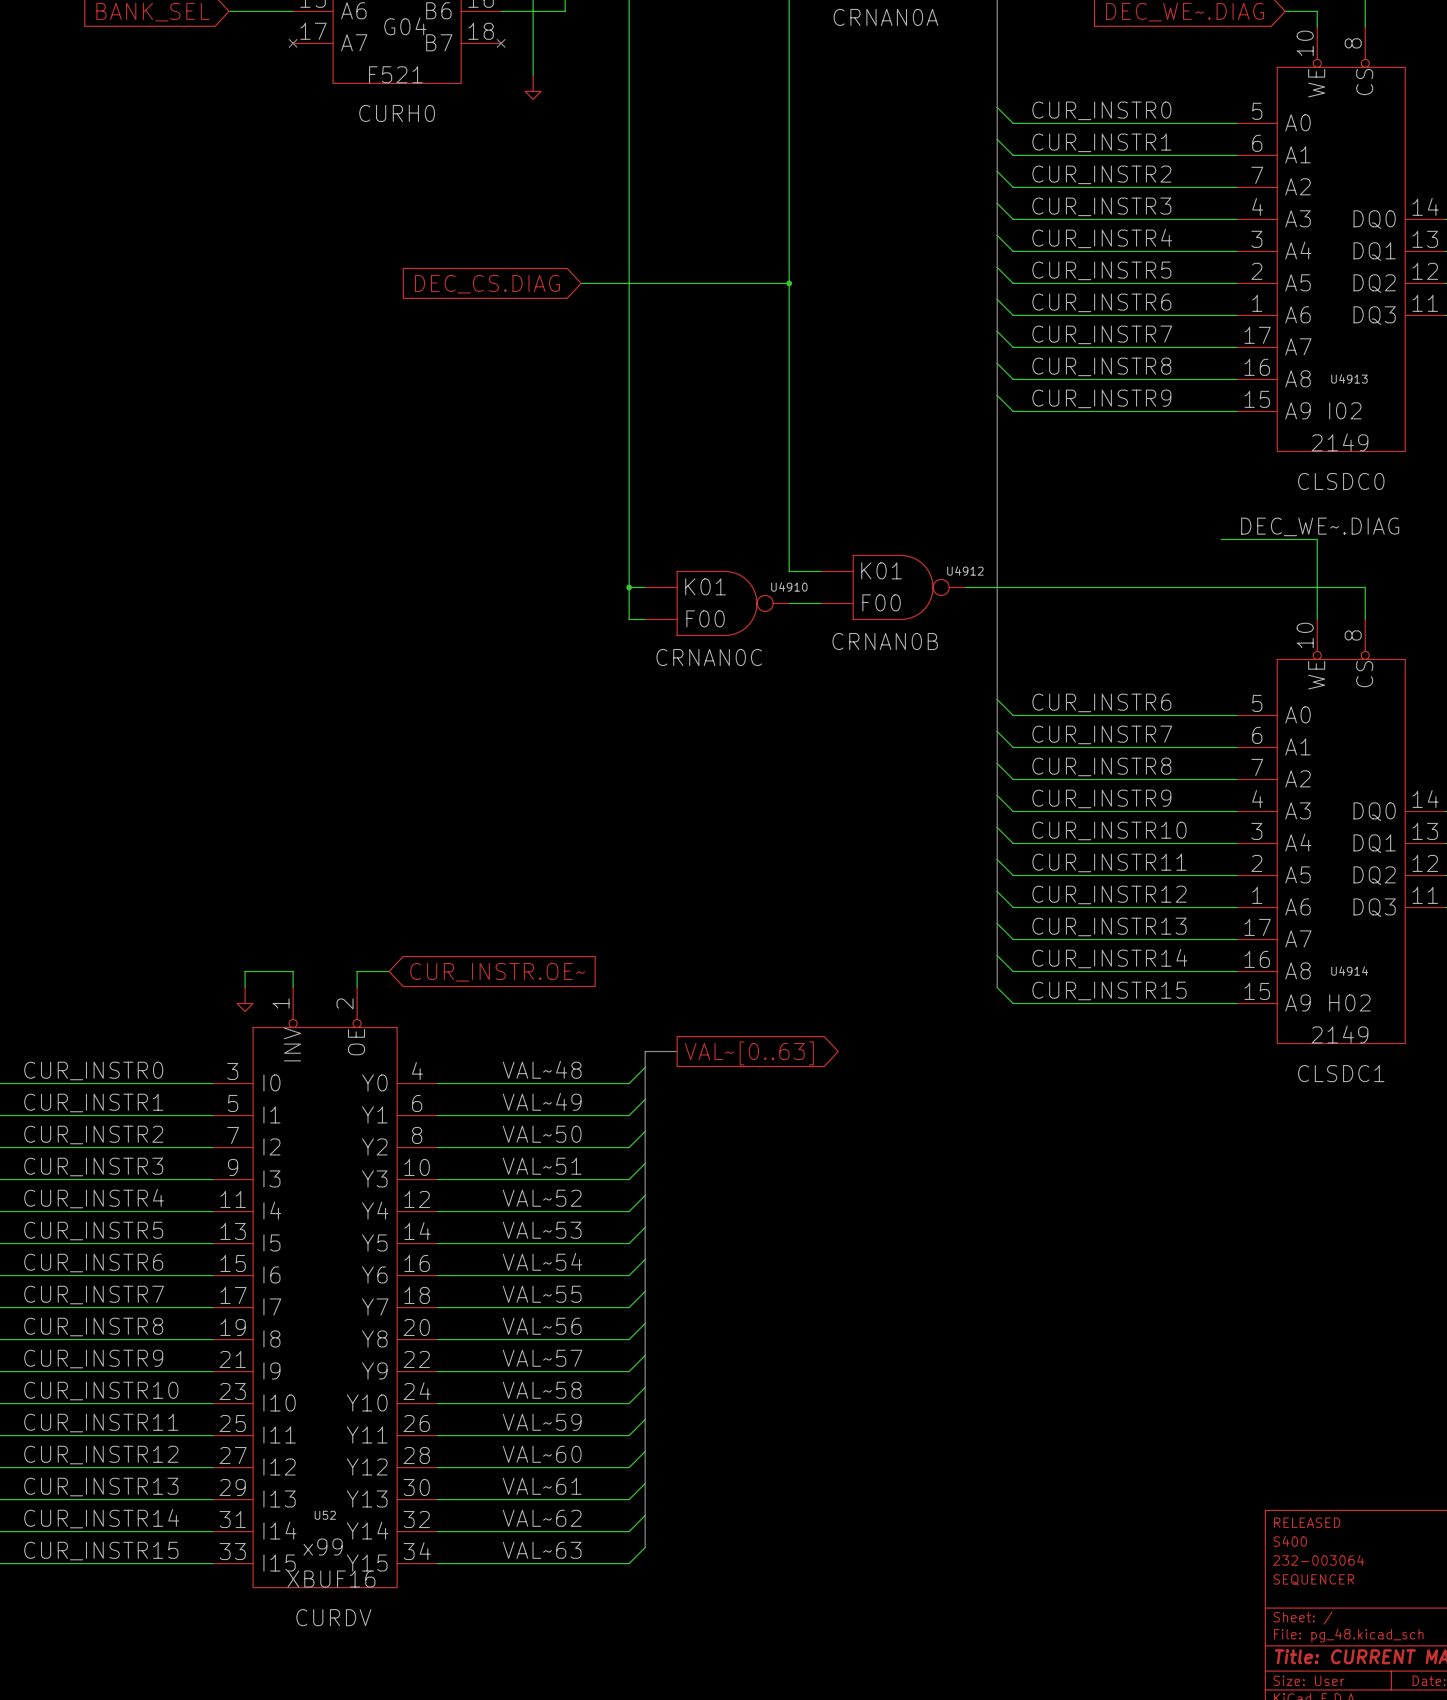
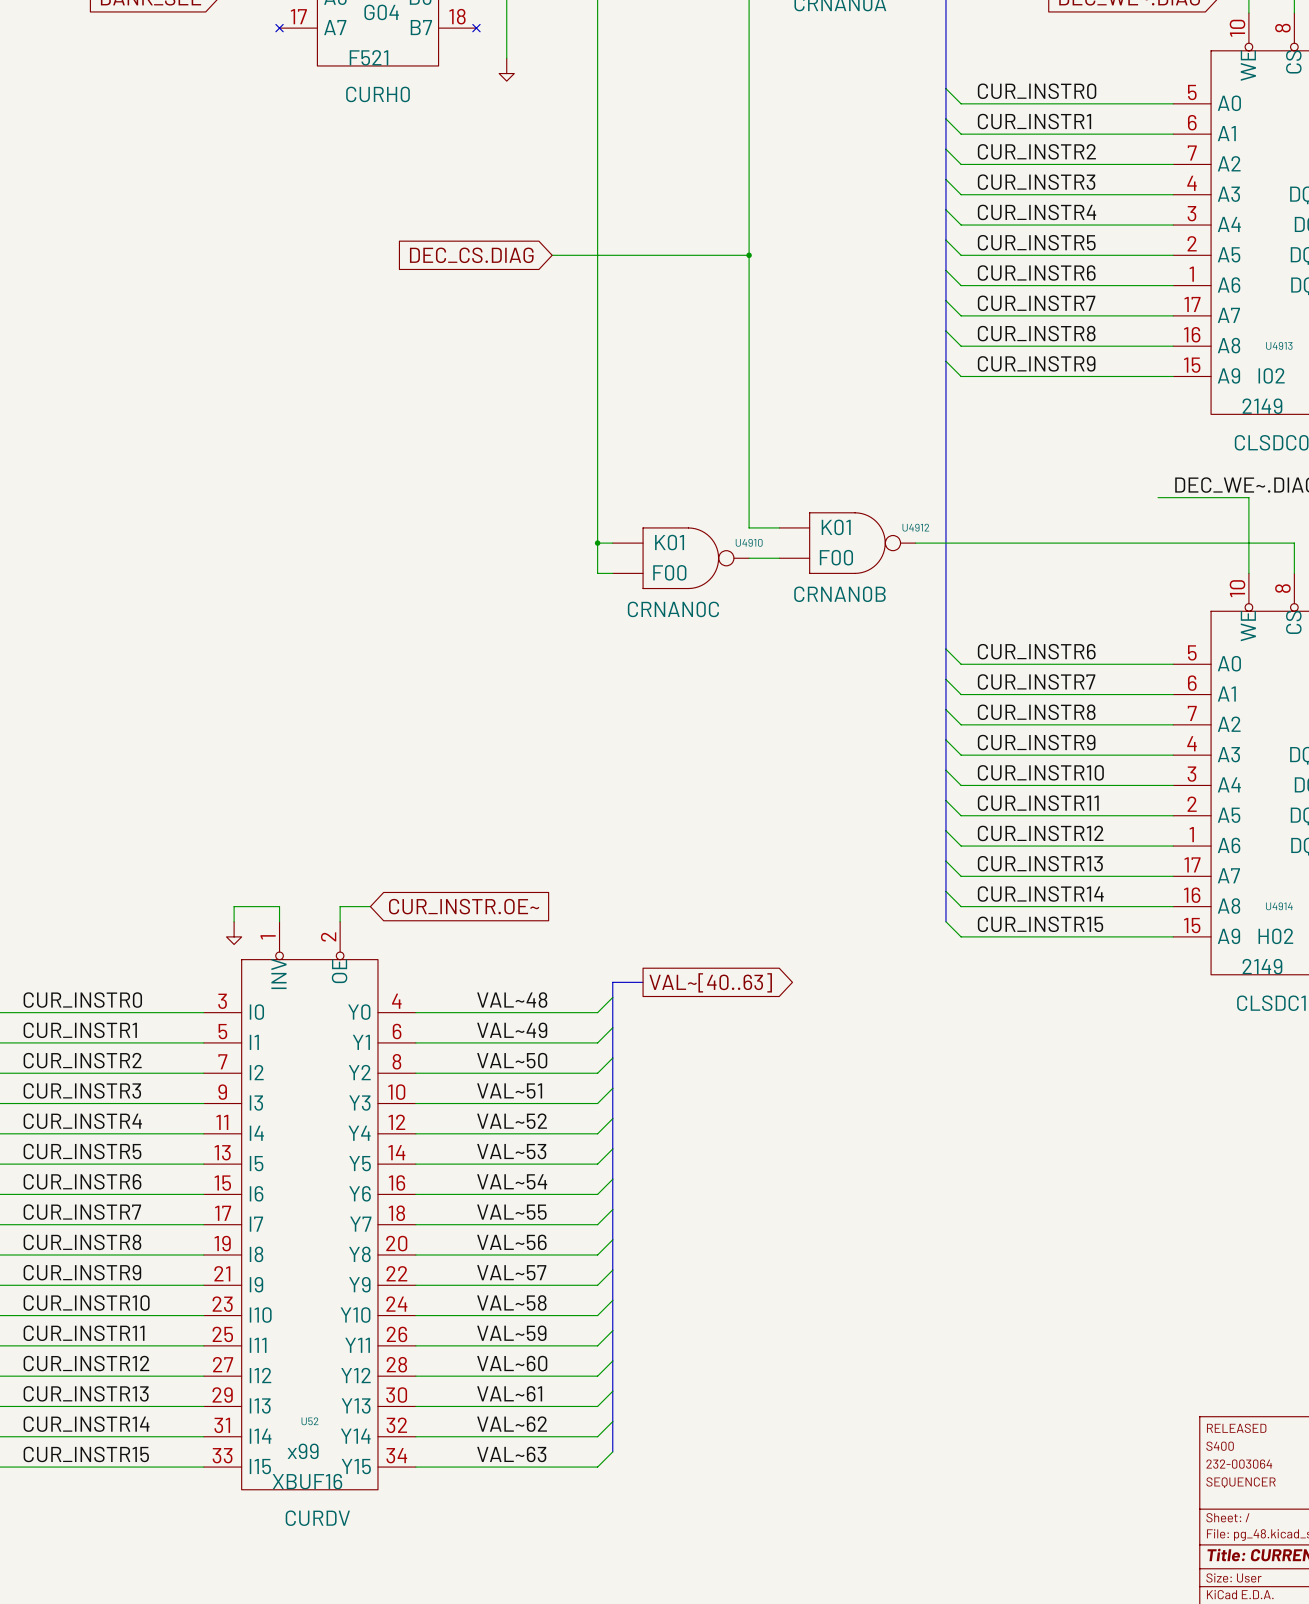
global label: VAL~[0..63] (749, 1053) -> VAL~[40..63] (710, 982)

